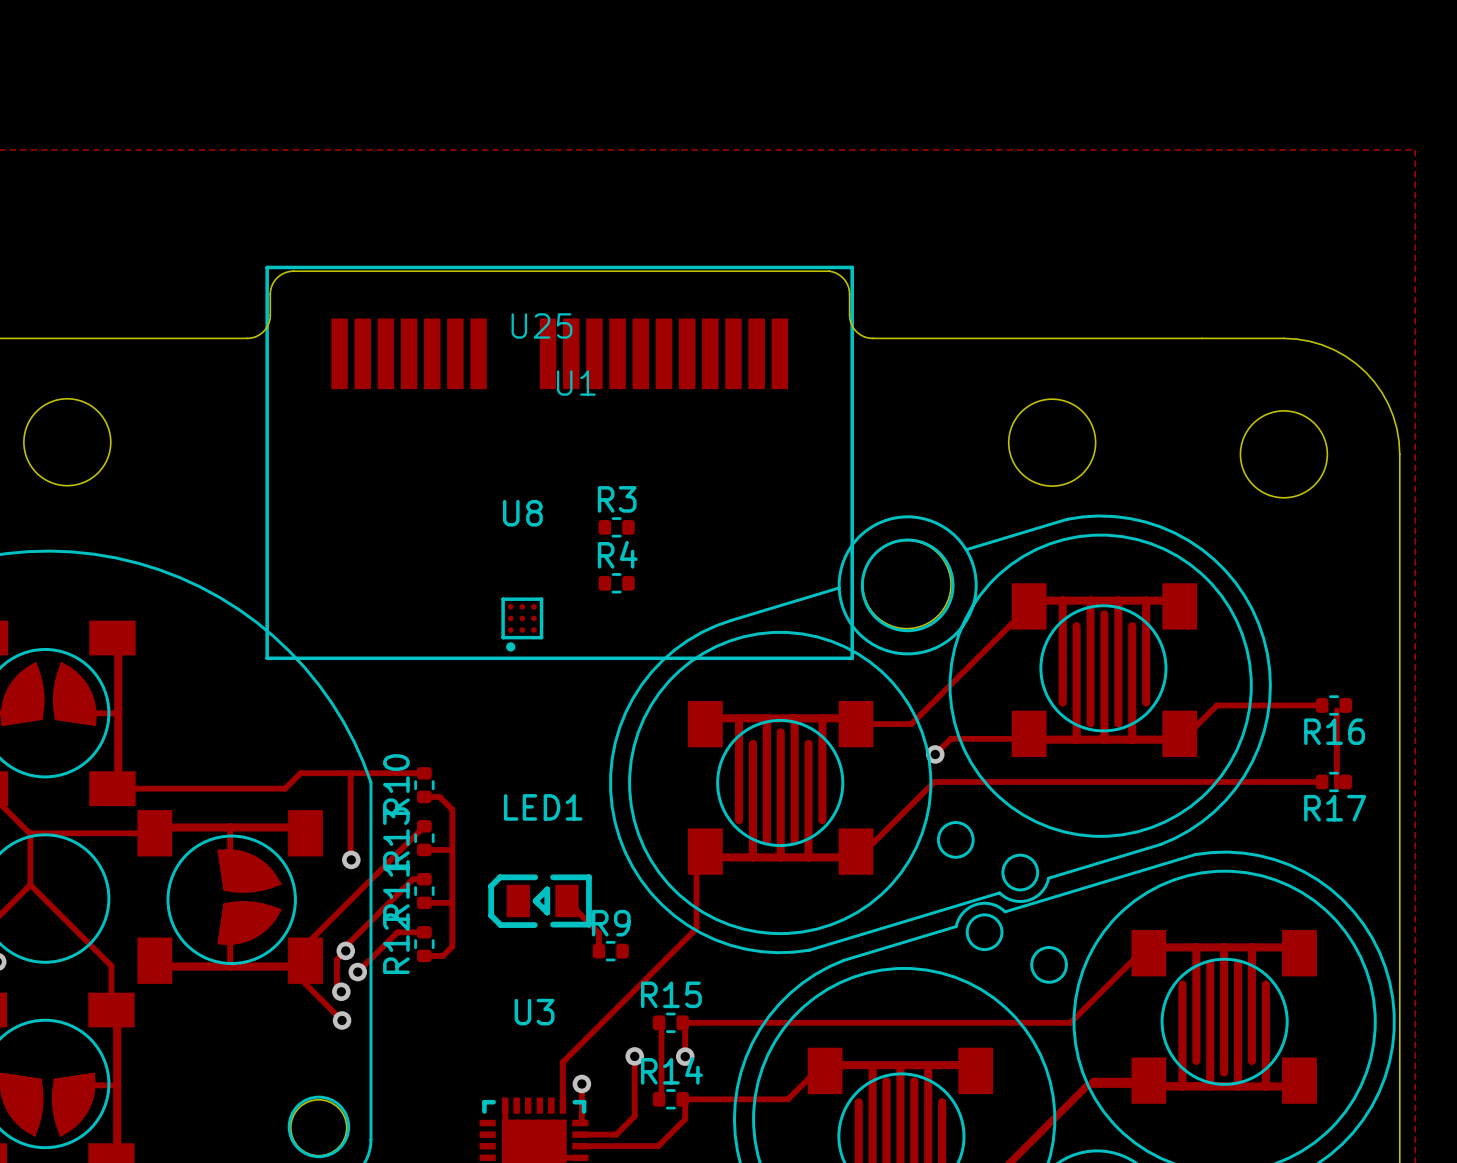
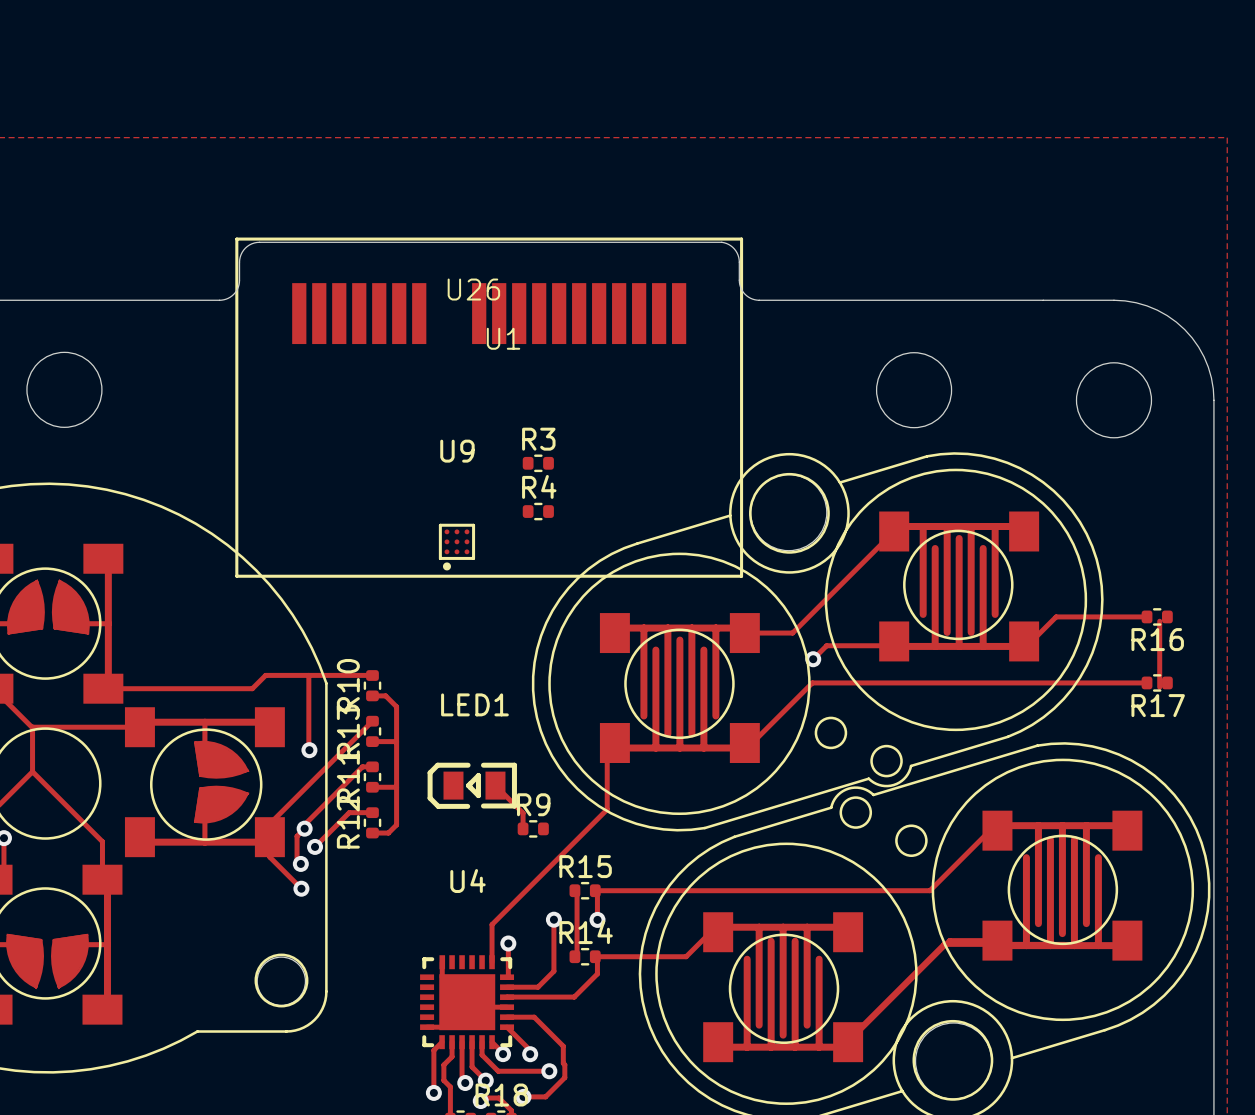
U25 name: U25 (541, 325) -> U26 (473, 289)
U8 name: U8 (522, 513) -> U9 (457, 451)
U3 name: U3 (534, 1012) -> U4 (468, 881)

